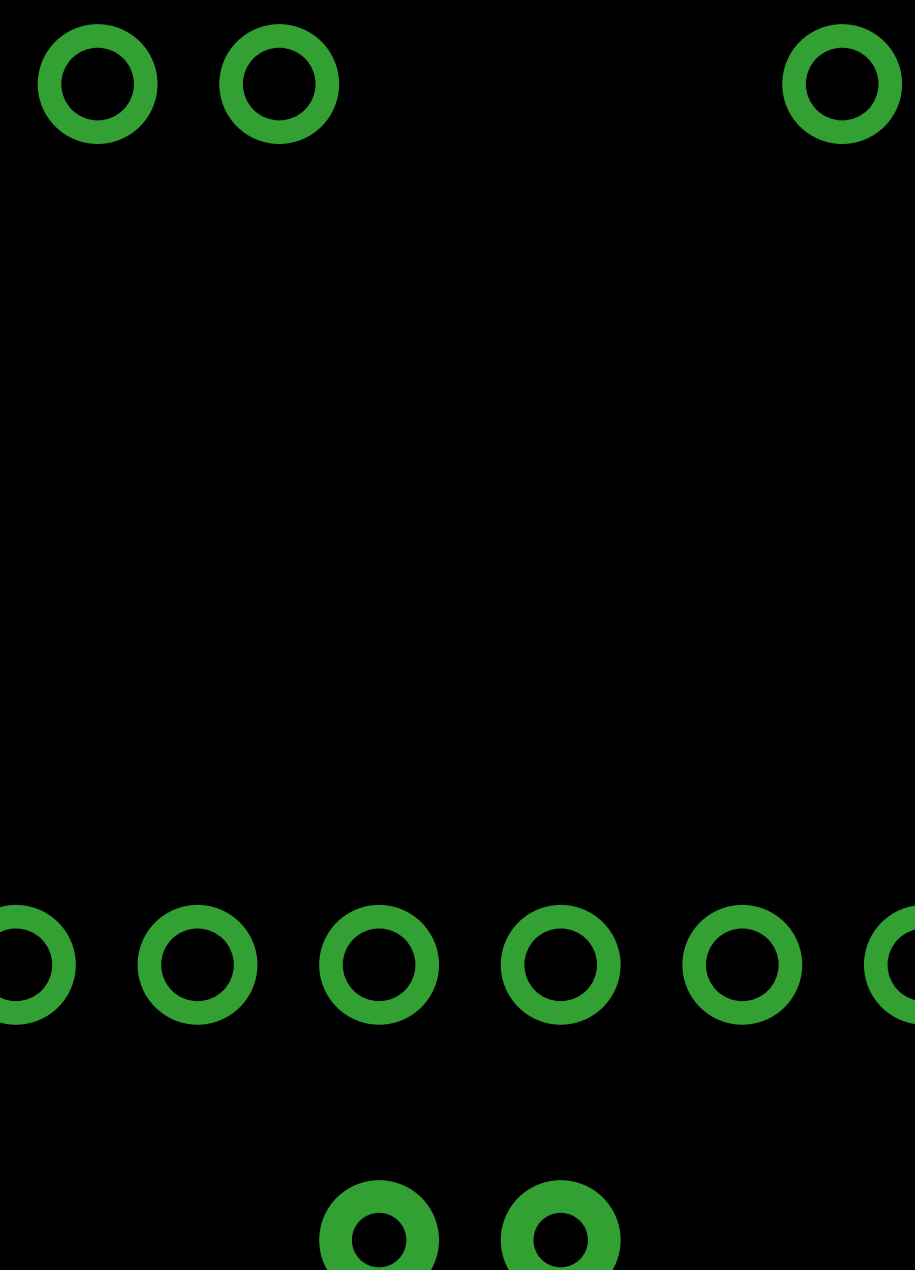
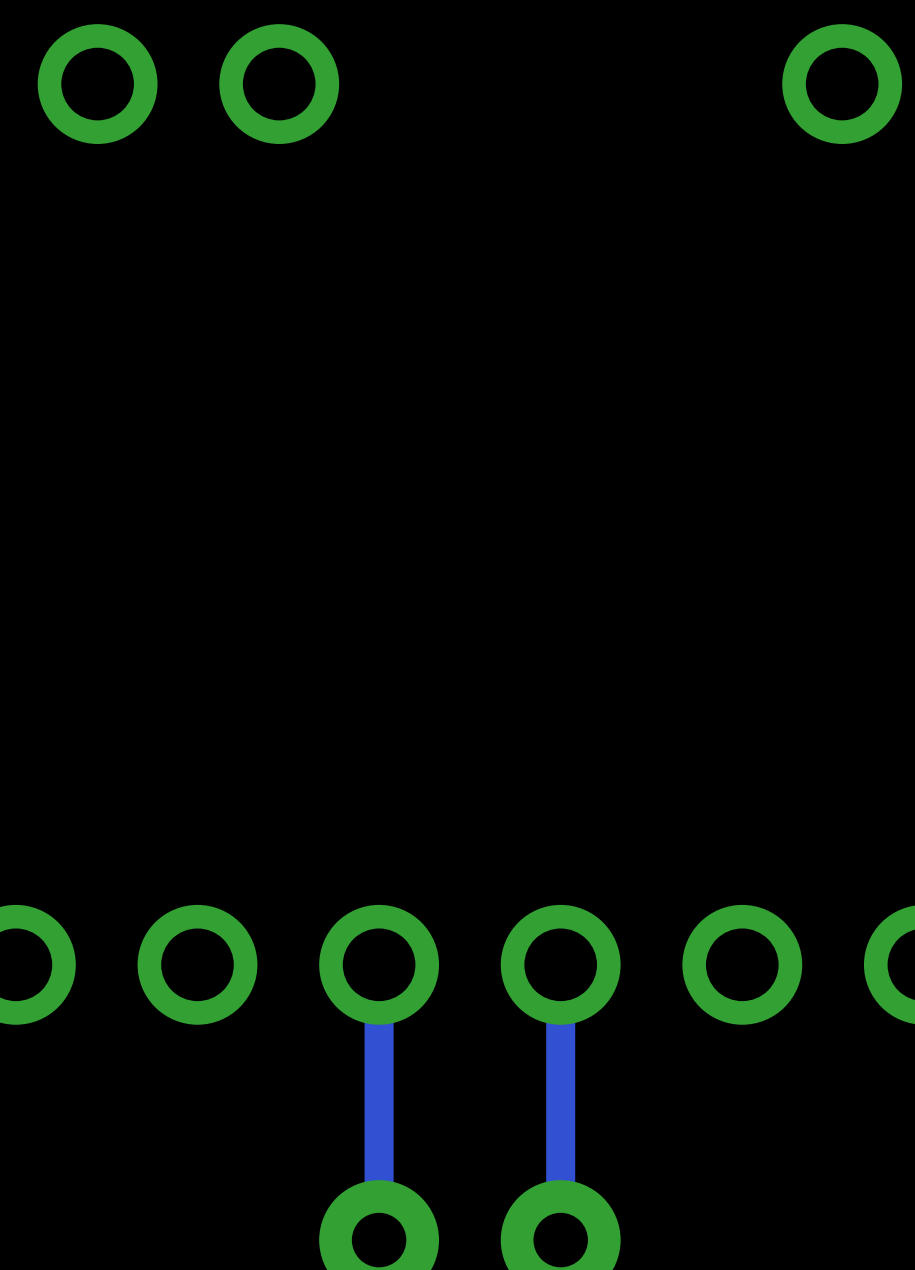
bottom track: none -> (379, 964) (379, 1240)
bottom track: none -> (560, 964) (560, 1240)

